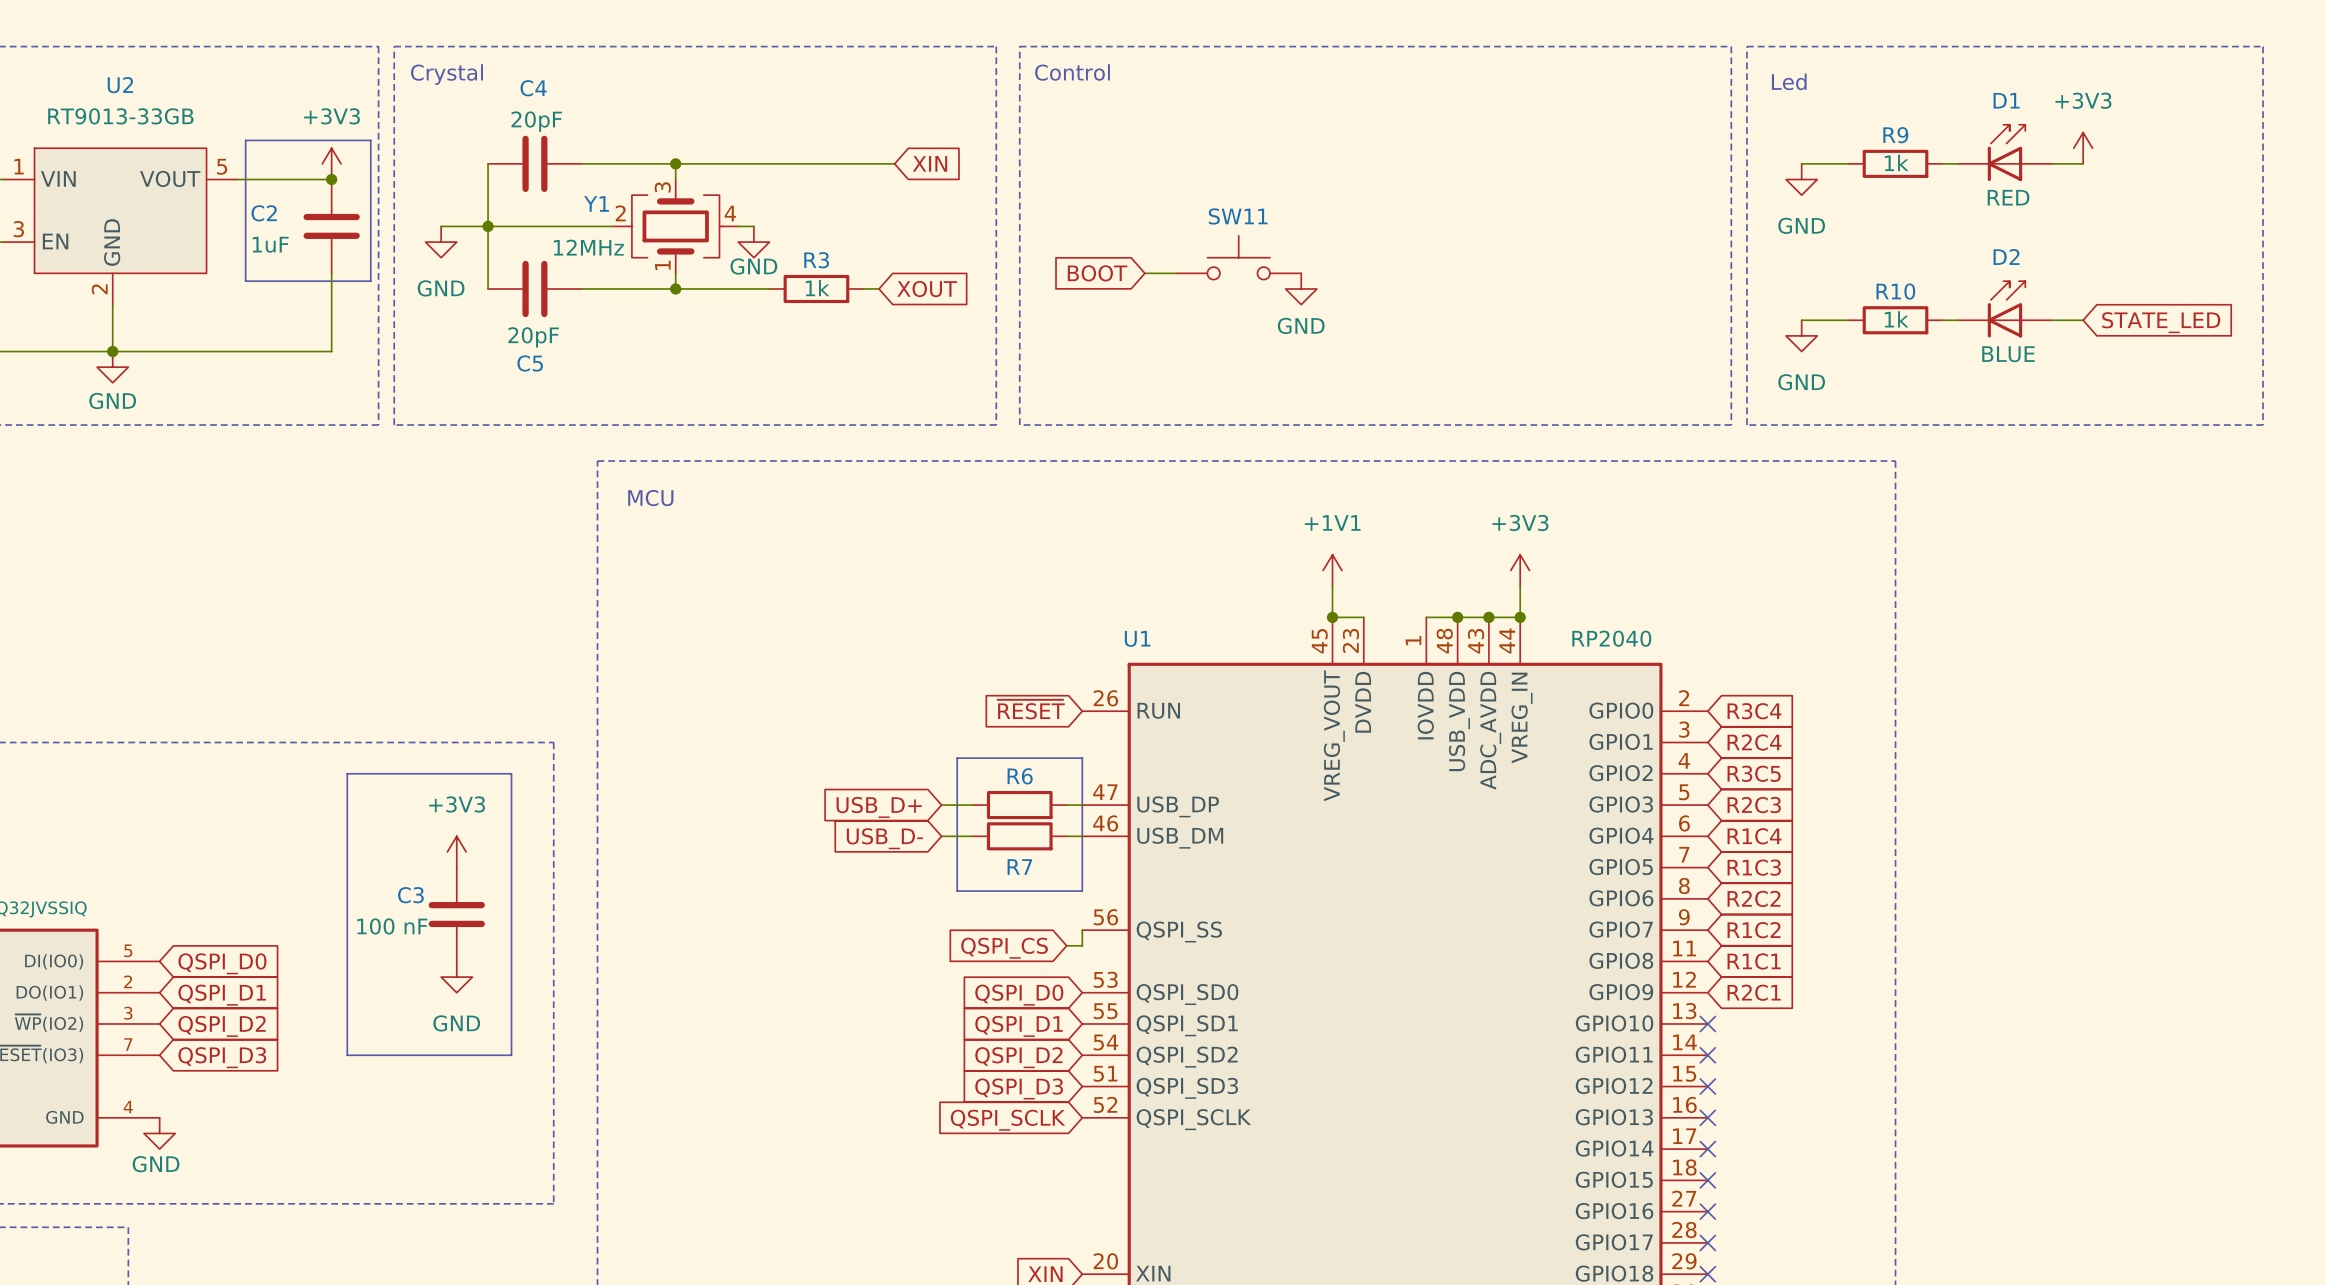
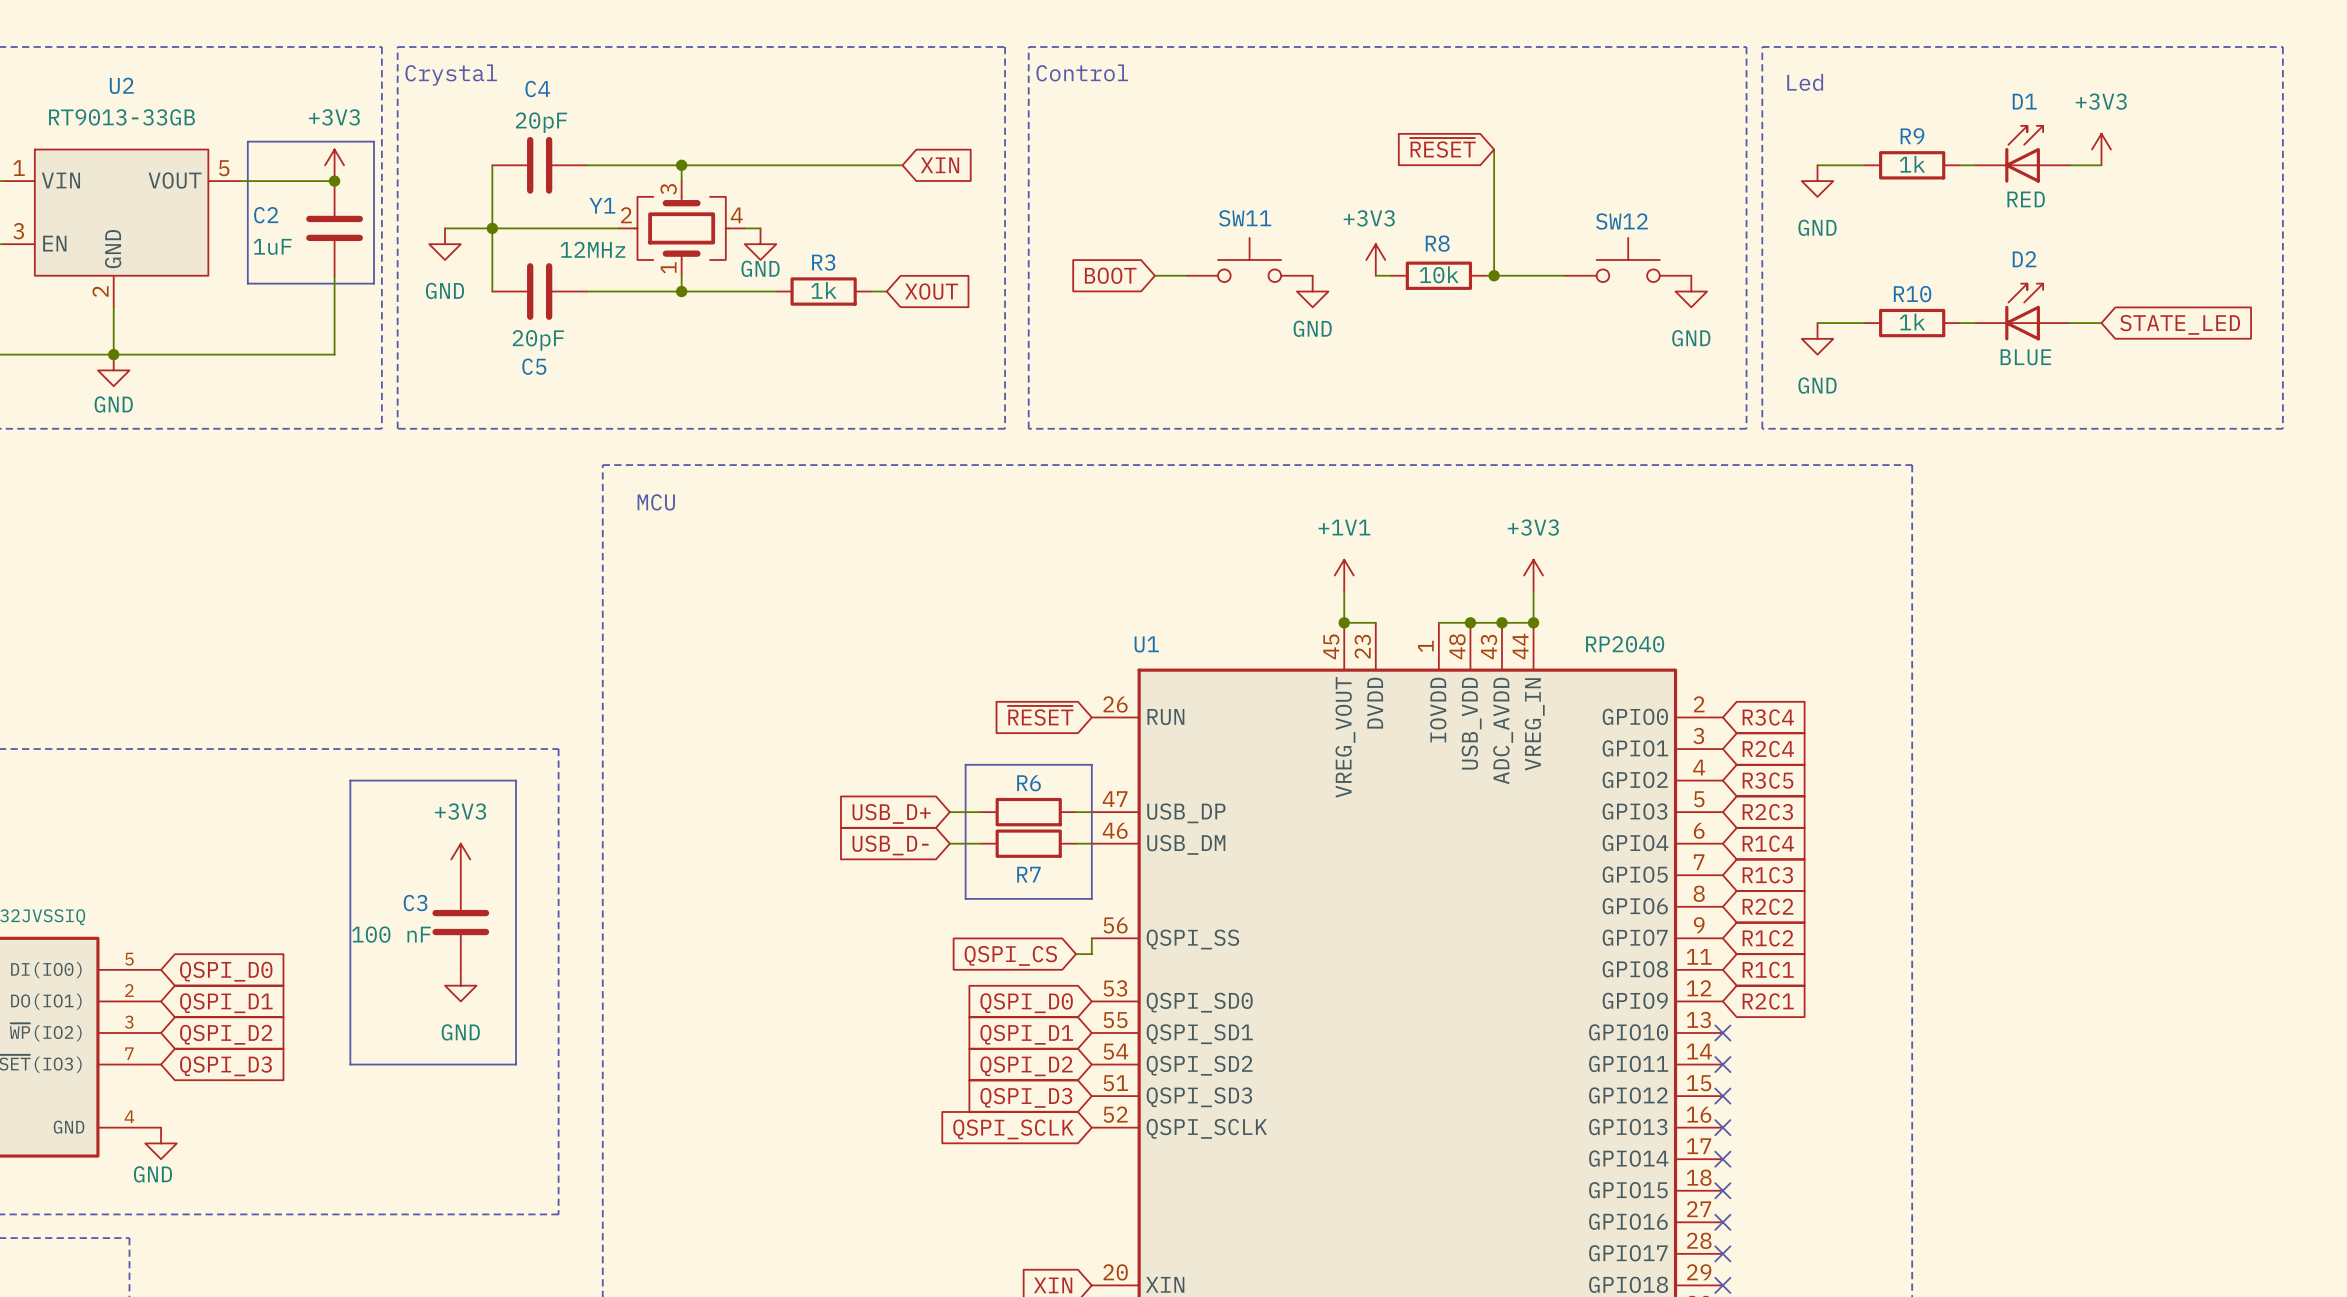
global label: none -> ~{RESET} (1442, 147)
wire: none -> (1494, 149) (1494, 275)
power symbol: none -> +3V3 (1375, 259)
SW12: none -> (1628, 259)
wire: none -> (1375, 275) (1391, 275)
R8: none -> 10k (1438, 275)
wire: none -> (1486, 275) (1565, 275)
junction: none -> (1494, 275)
power symbol: none -> GND (1691, 291)

